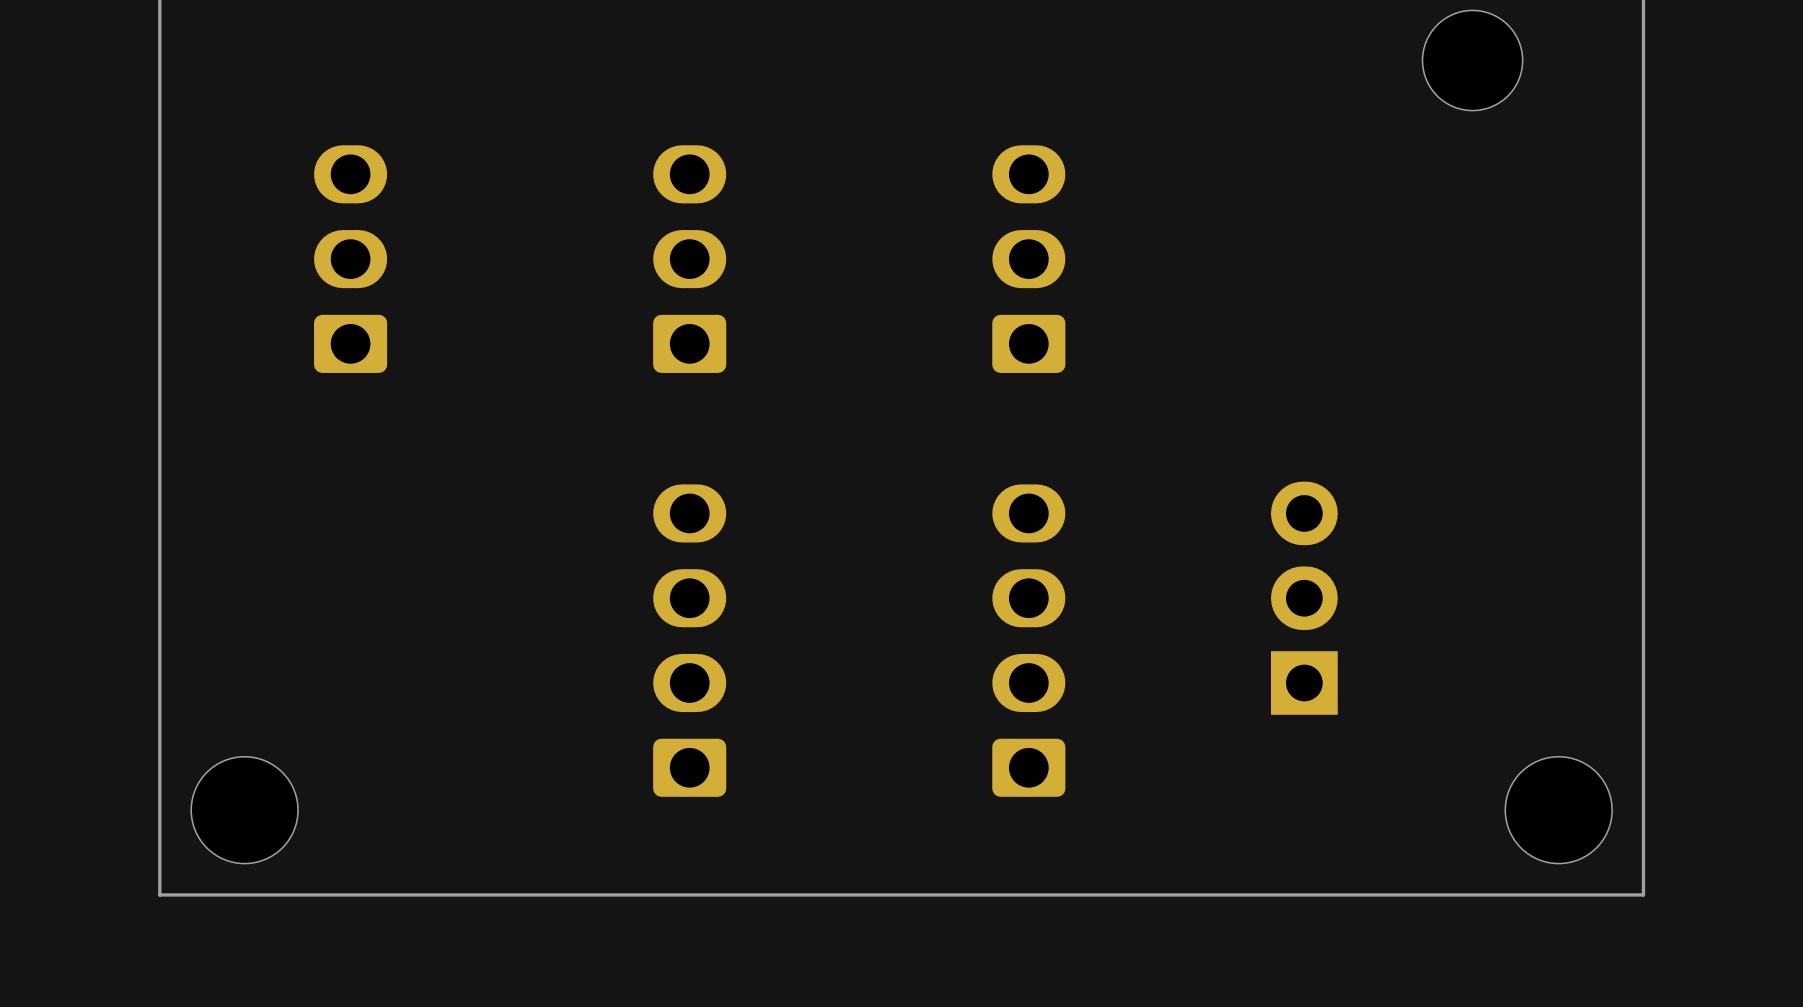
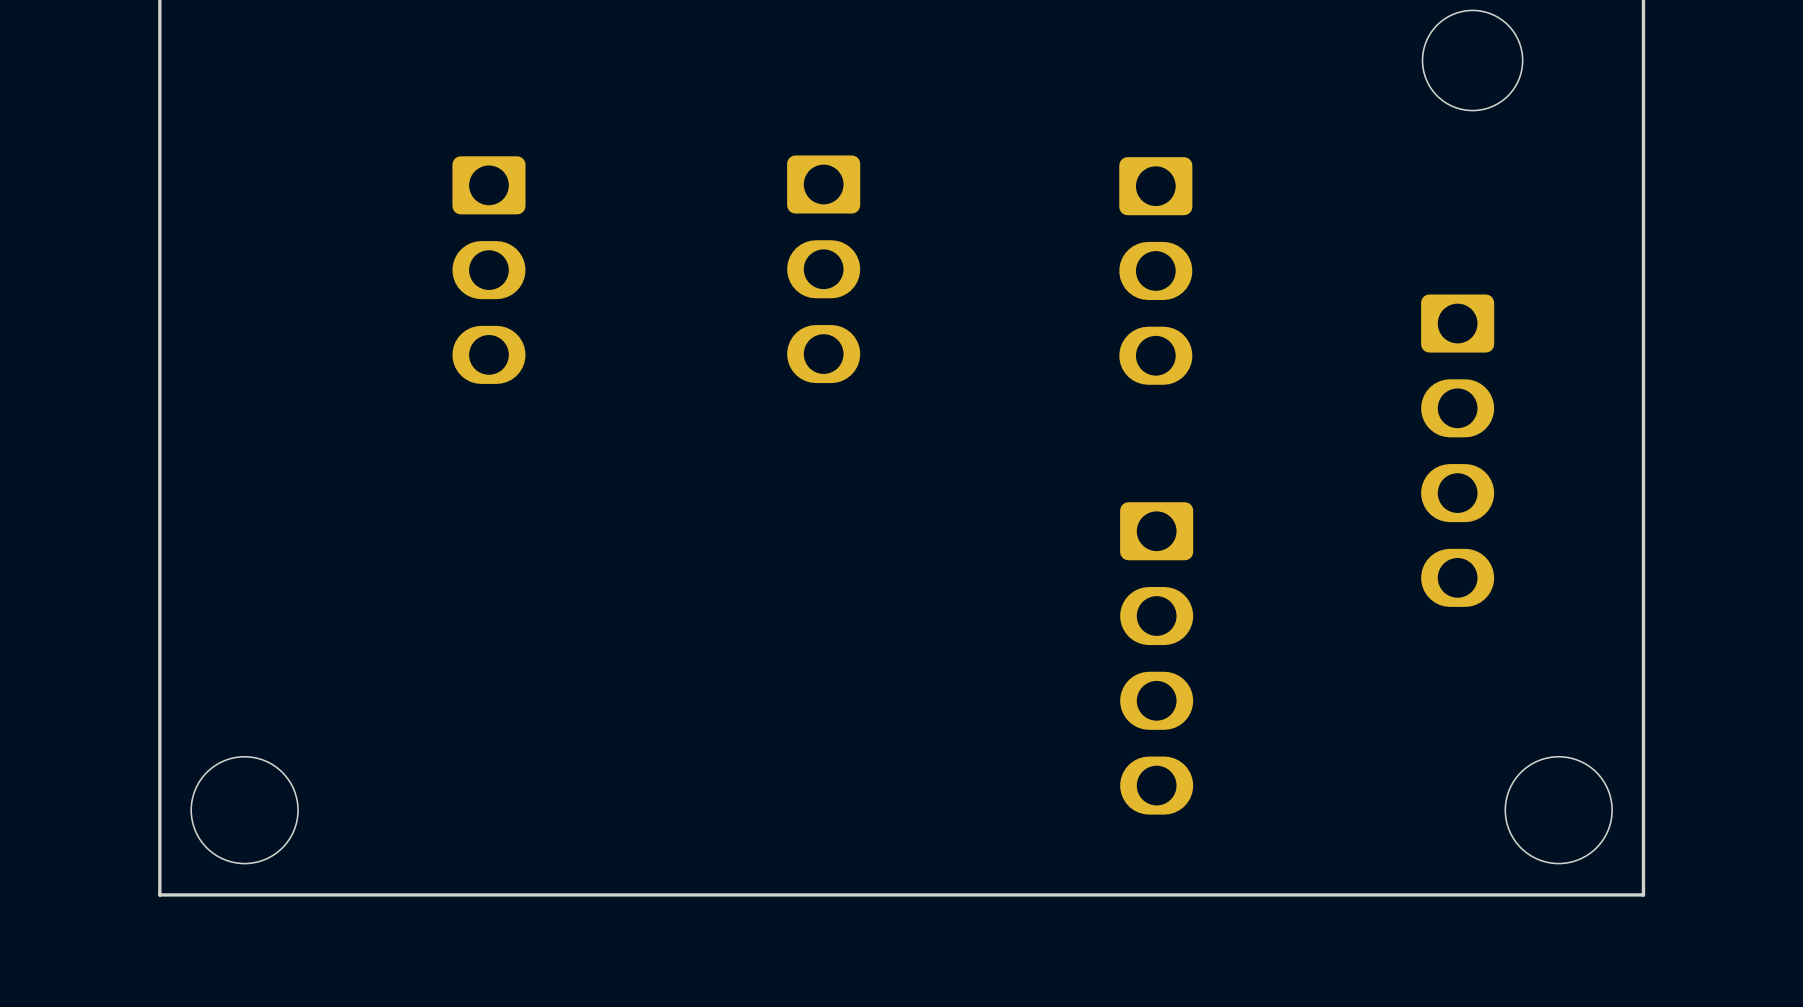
part: (350, 259) -> none
part: (689, 259) -> none
part: (1028, 259) -> none
part: none -> (823, 269)
part: none -> (488, 270)
part: none -> (1155, 270)
part: none -> (1457, 450)
part: (1304, 598) -> none
part: (689, 640) -> none
part rotation: 0° (1028, 640) -> 180° (1156, 658)

